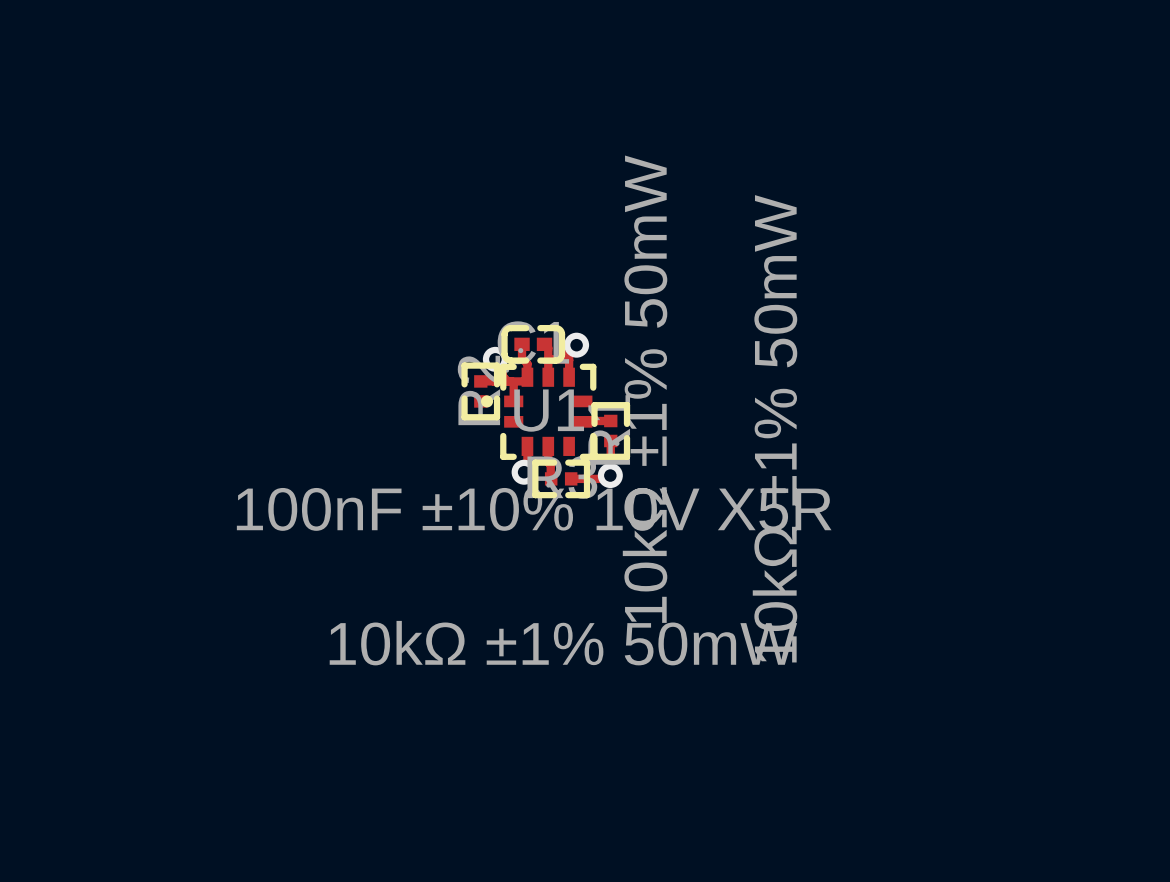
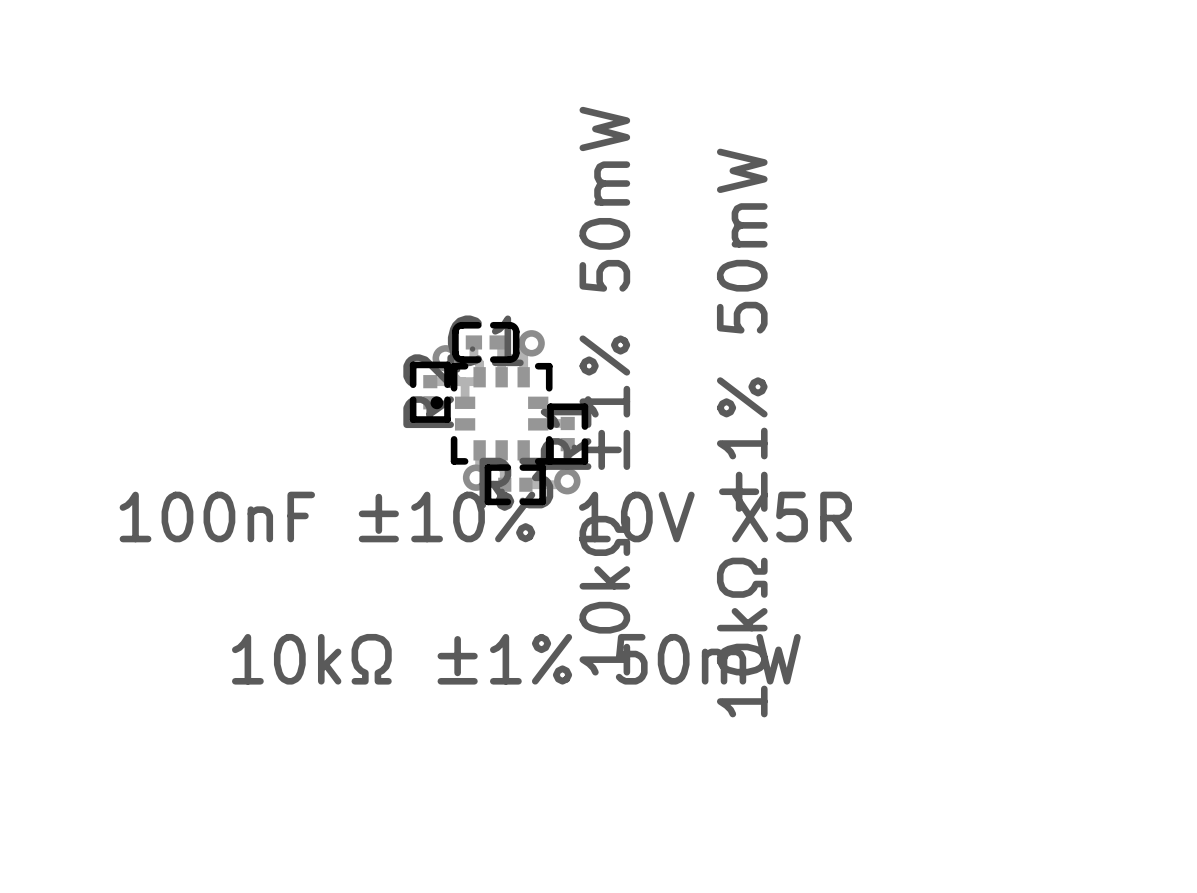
U1 name: U1 (549, 410) -> none

